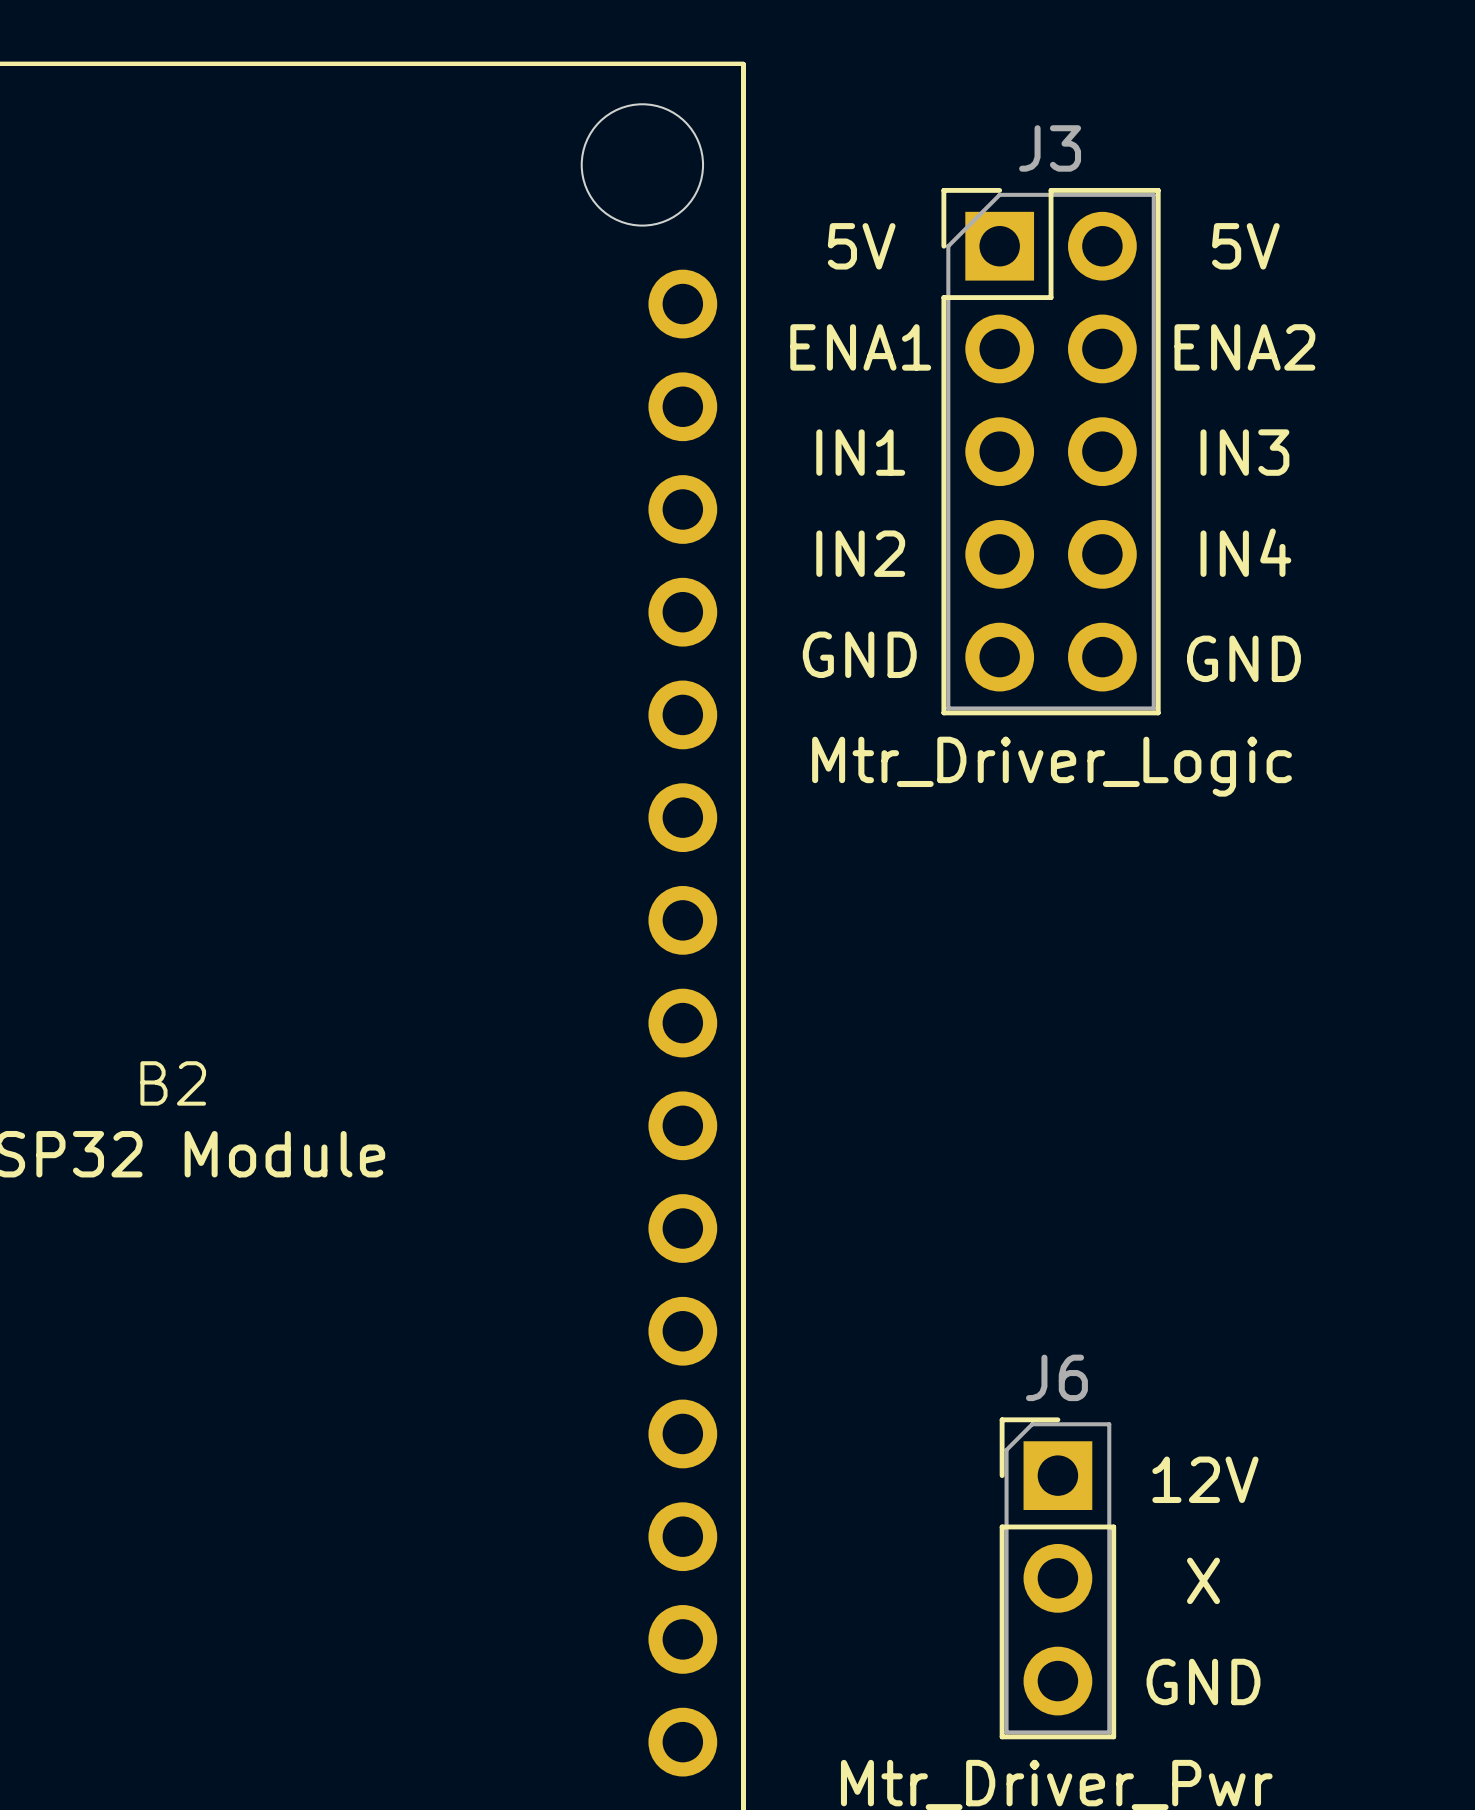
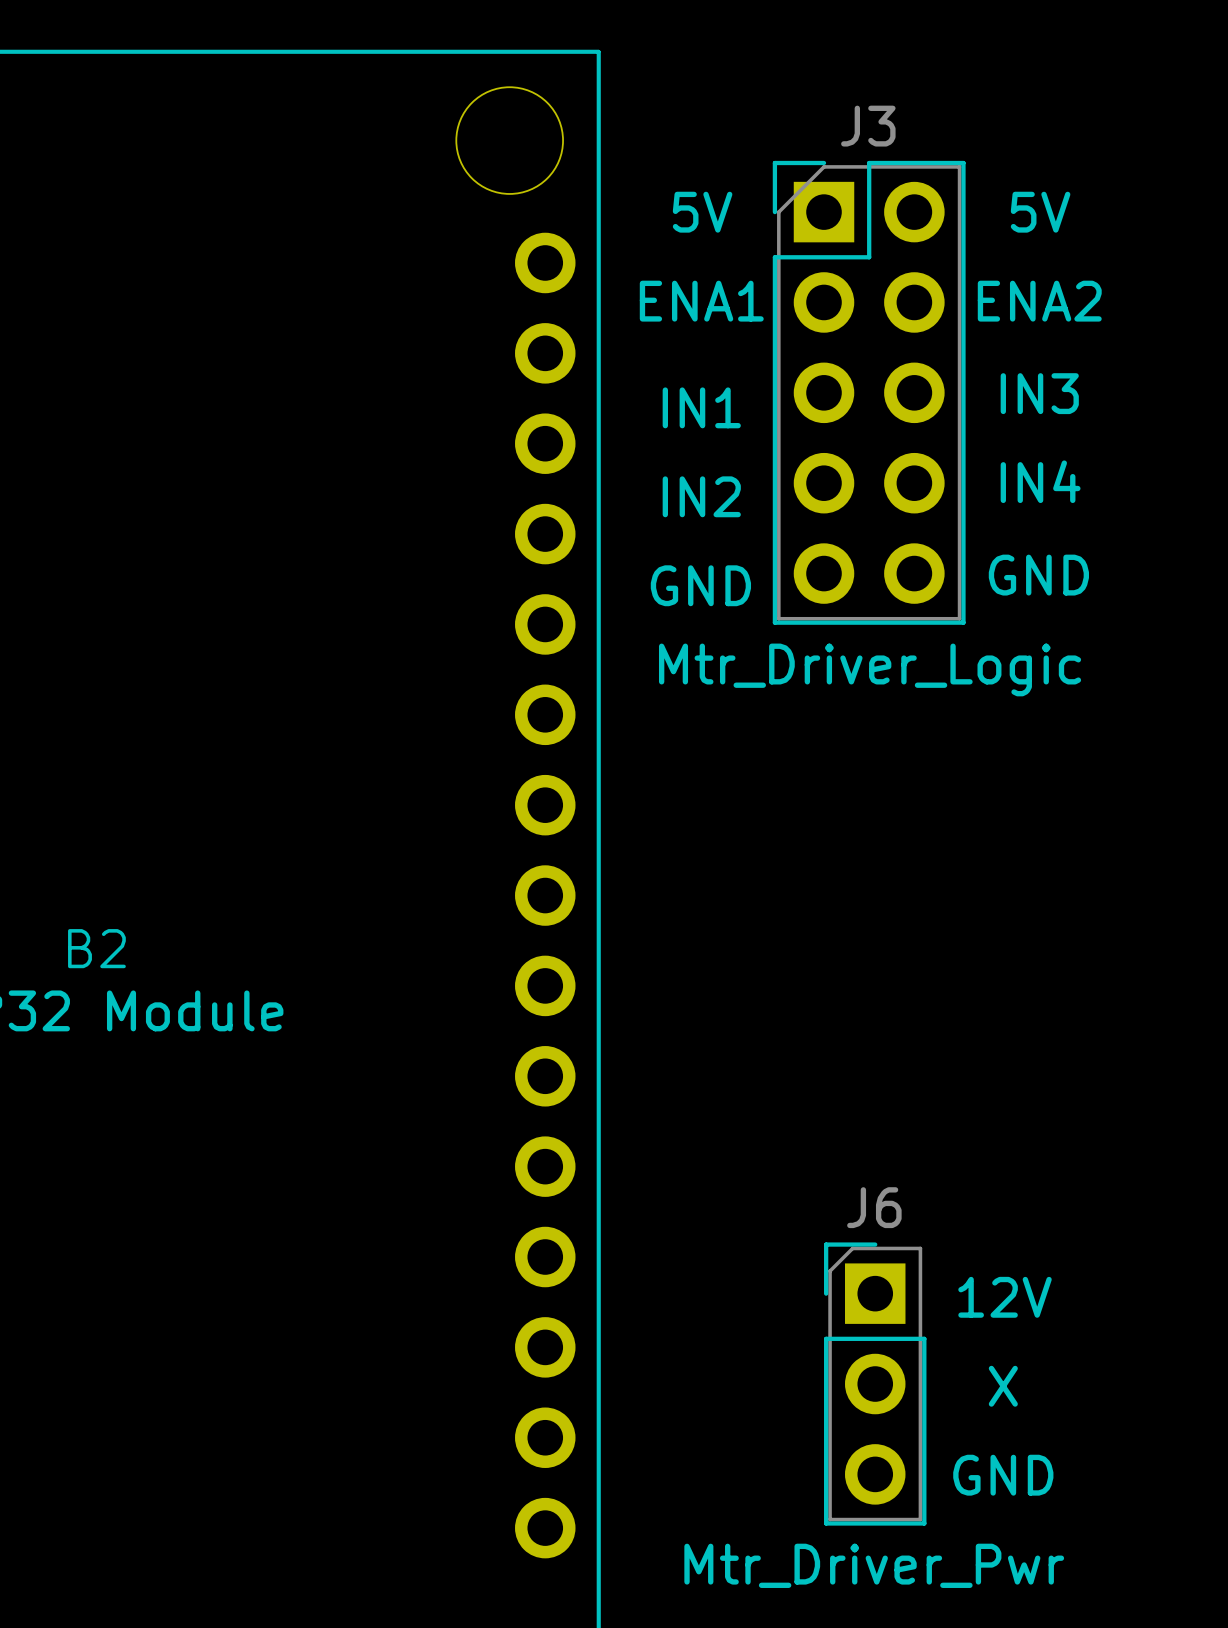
text position: IN1 (860, 452) -> IN1 (701, 407)
text position: IN2 (860, 553) -> IN2 (701, 496)
text position: GND (859, 654) -> GND (700, 585)

